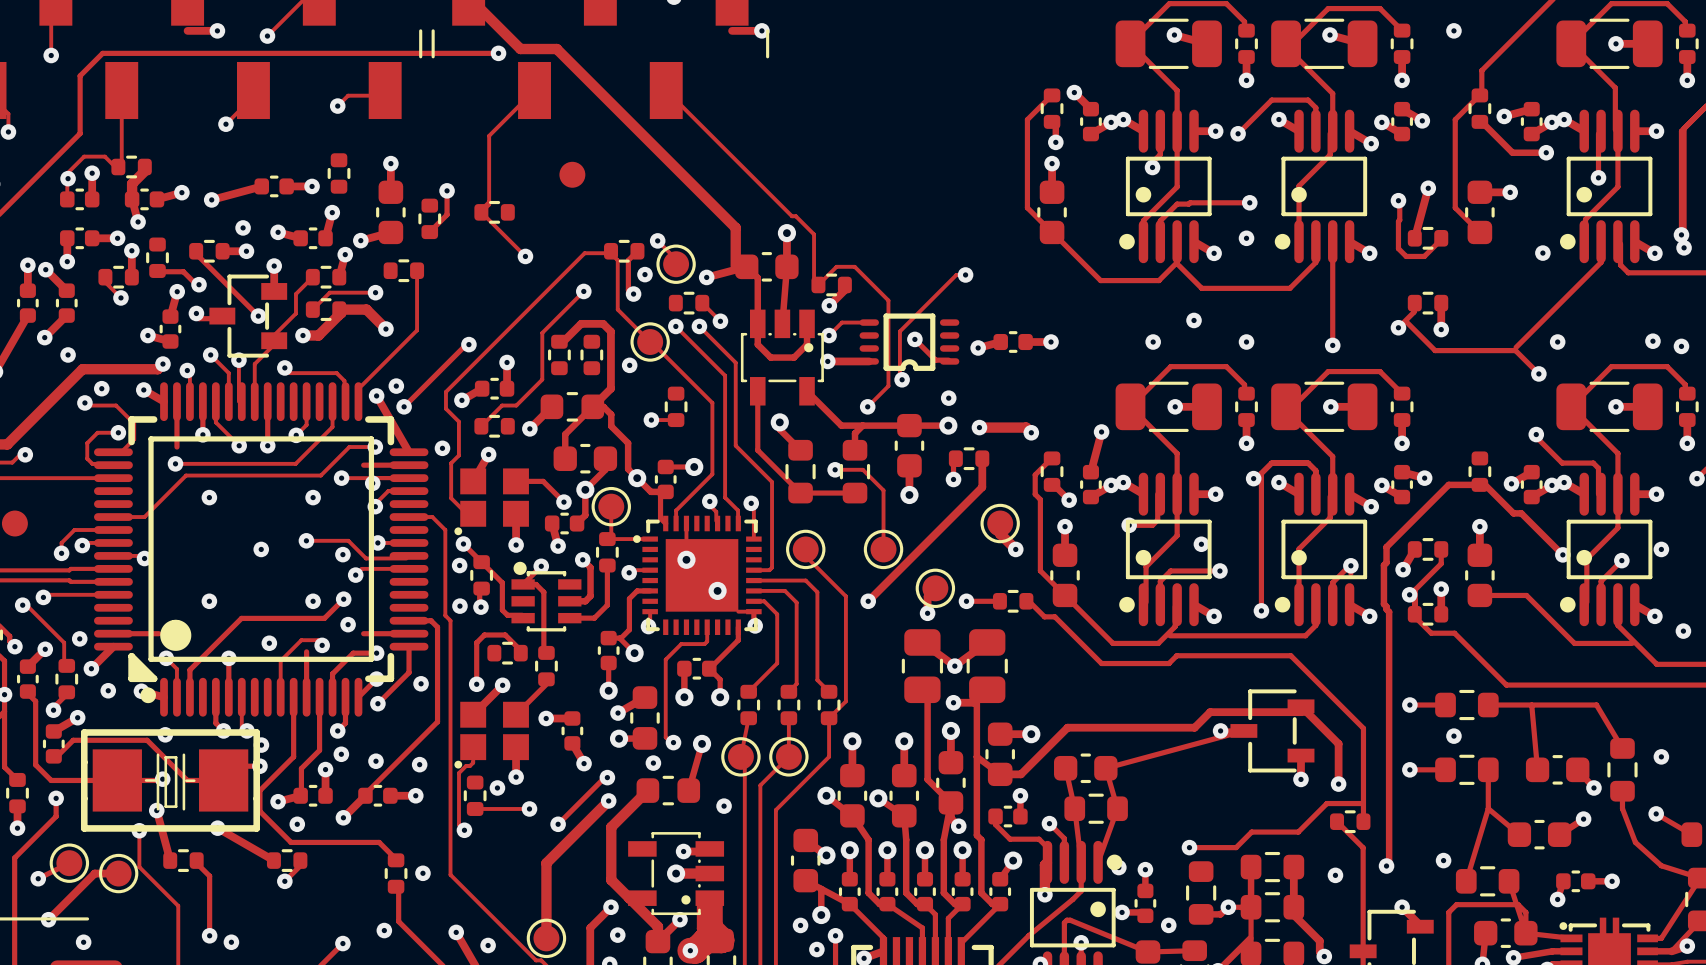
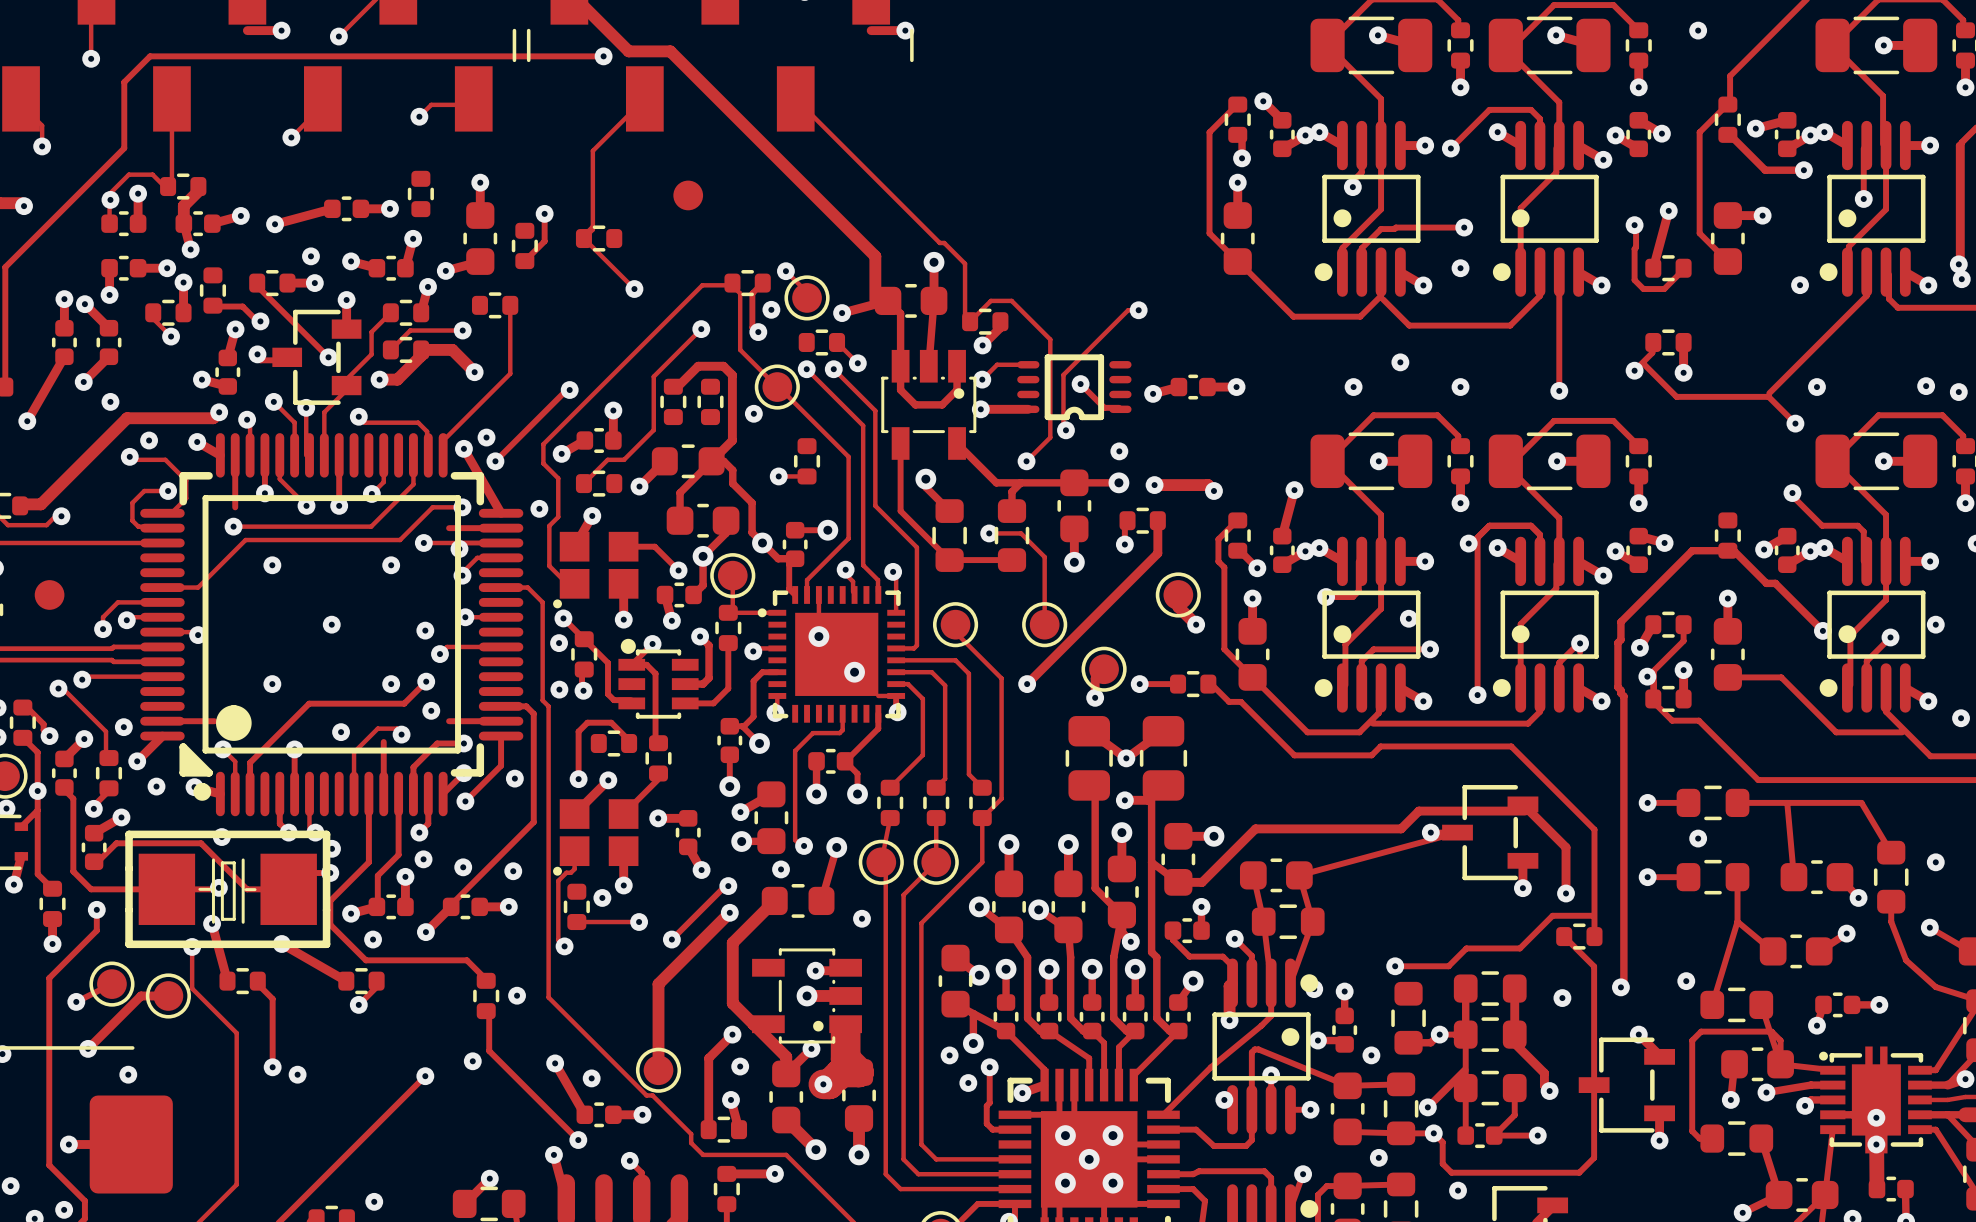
track: (306, 540) (348, 540) (366, 558) (406, 558) -> none
via: (306, 540) -> none

